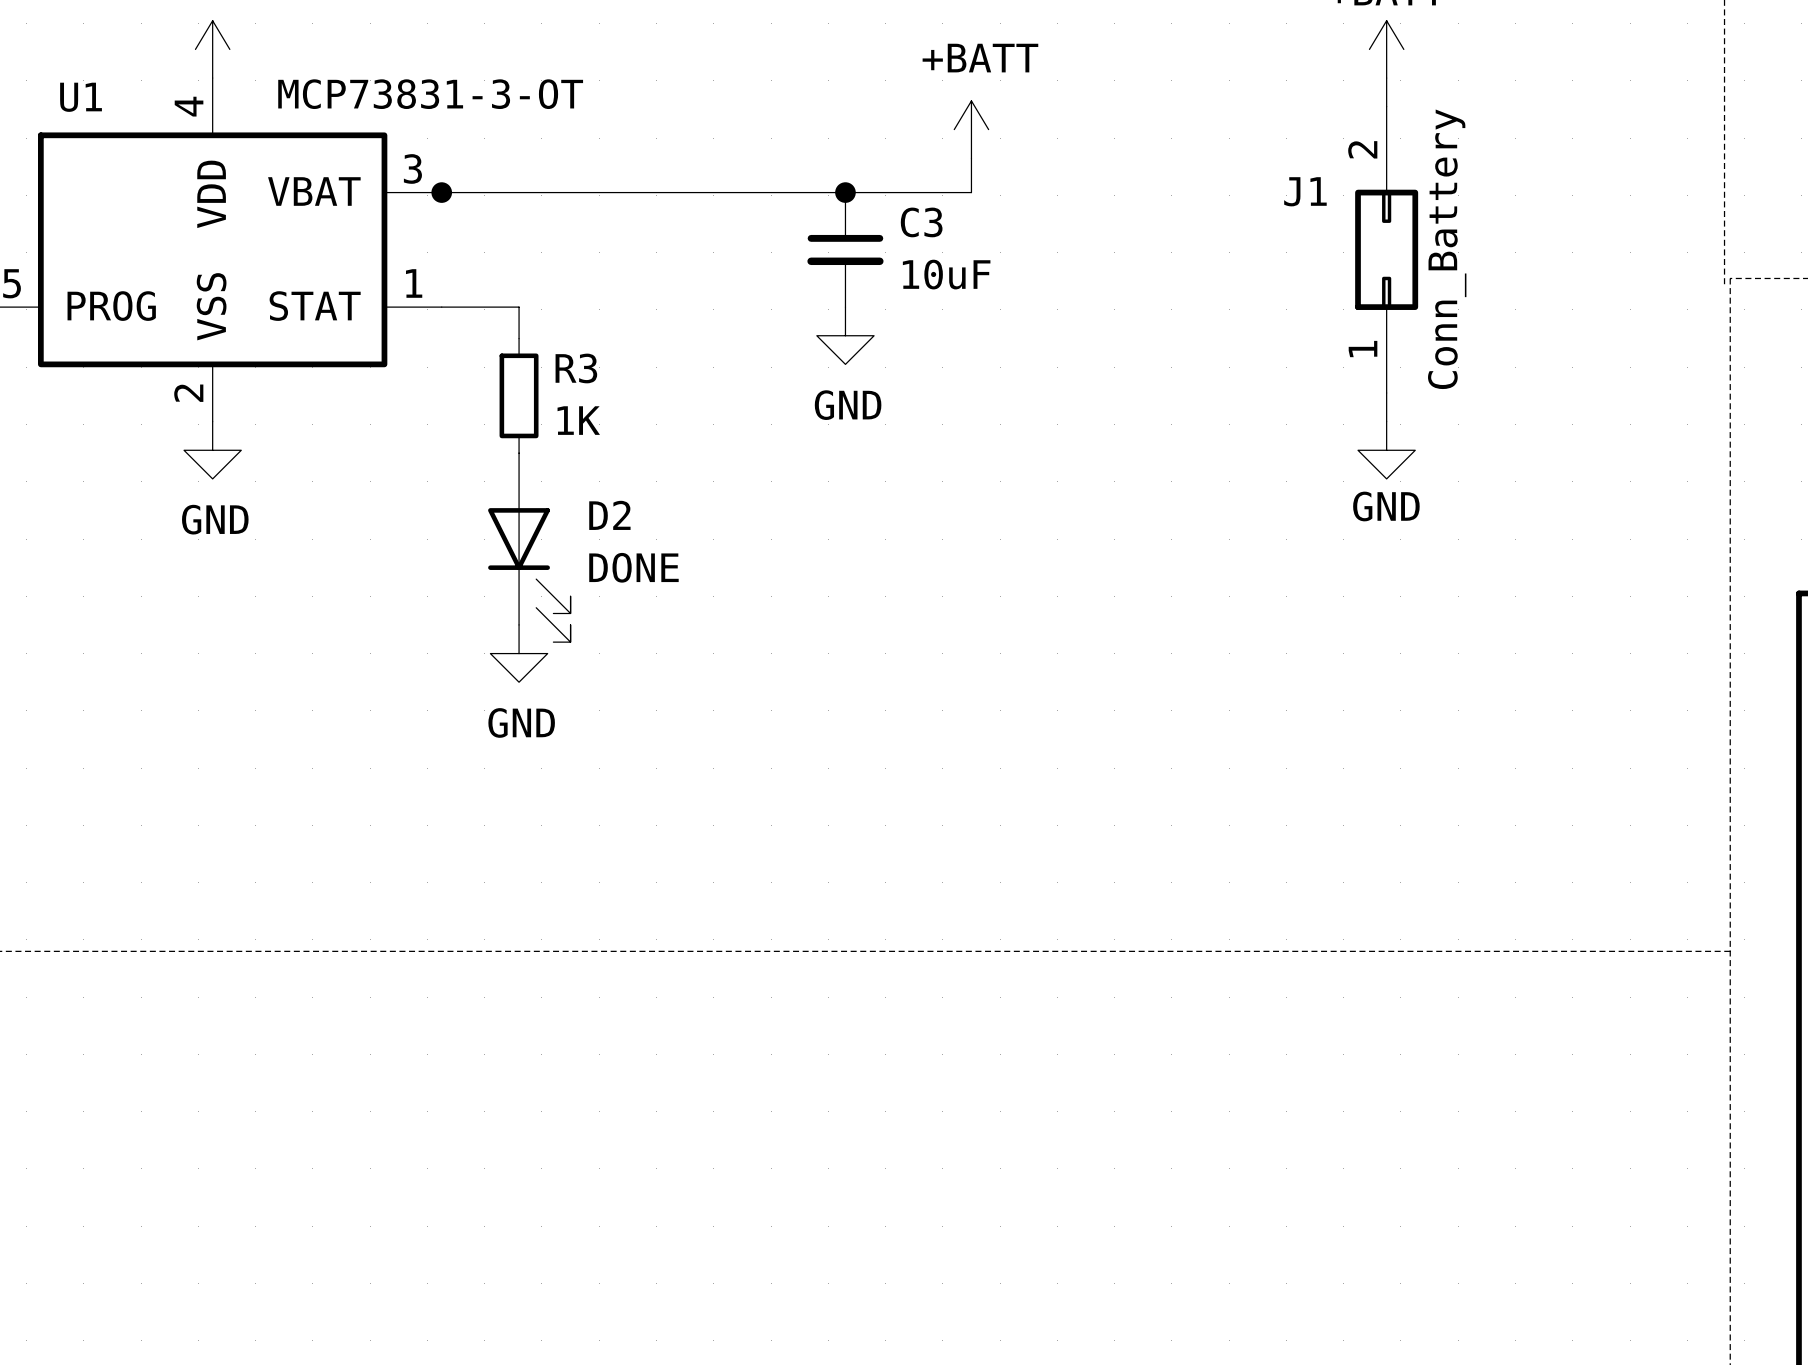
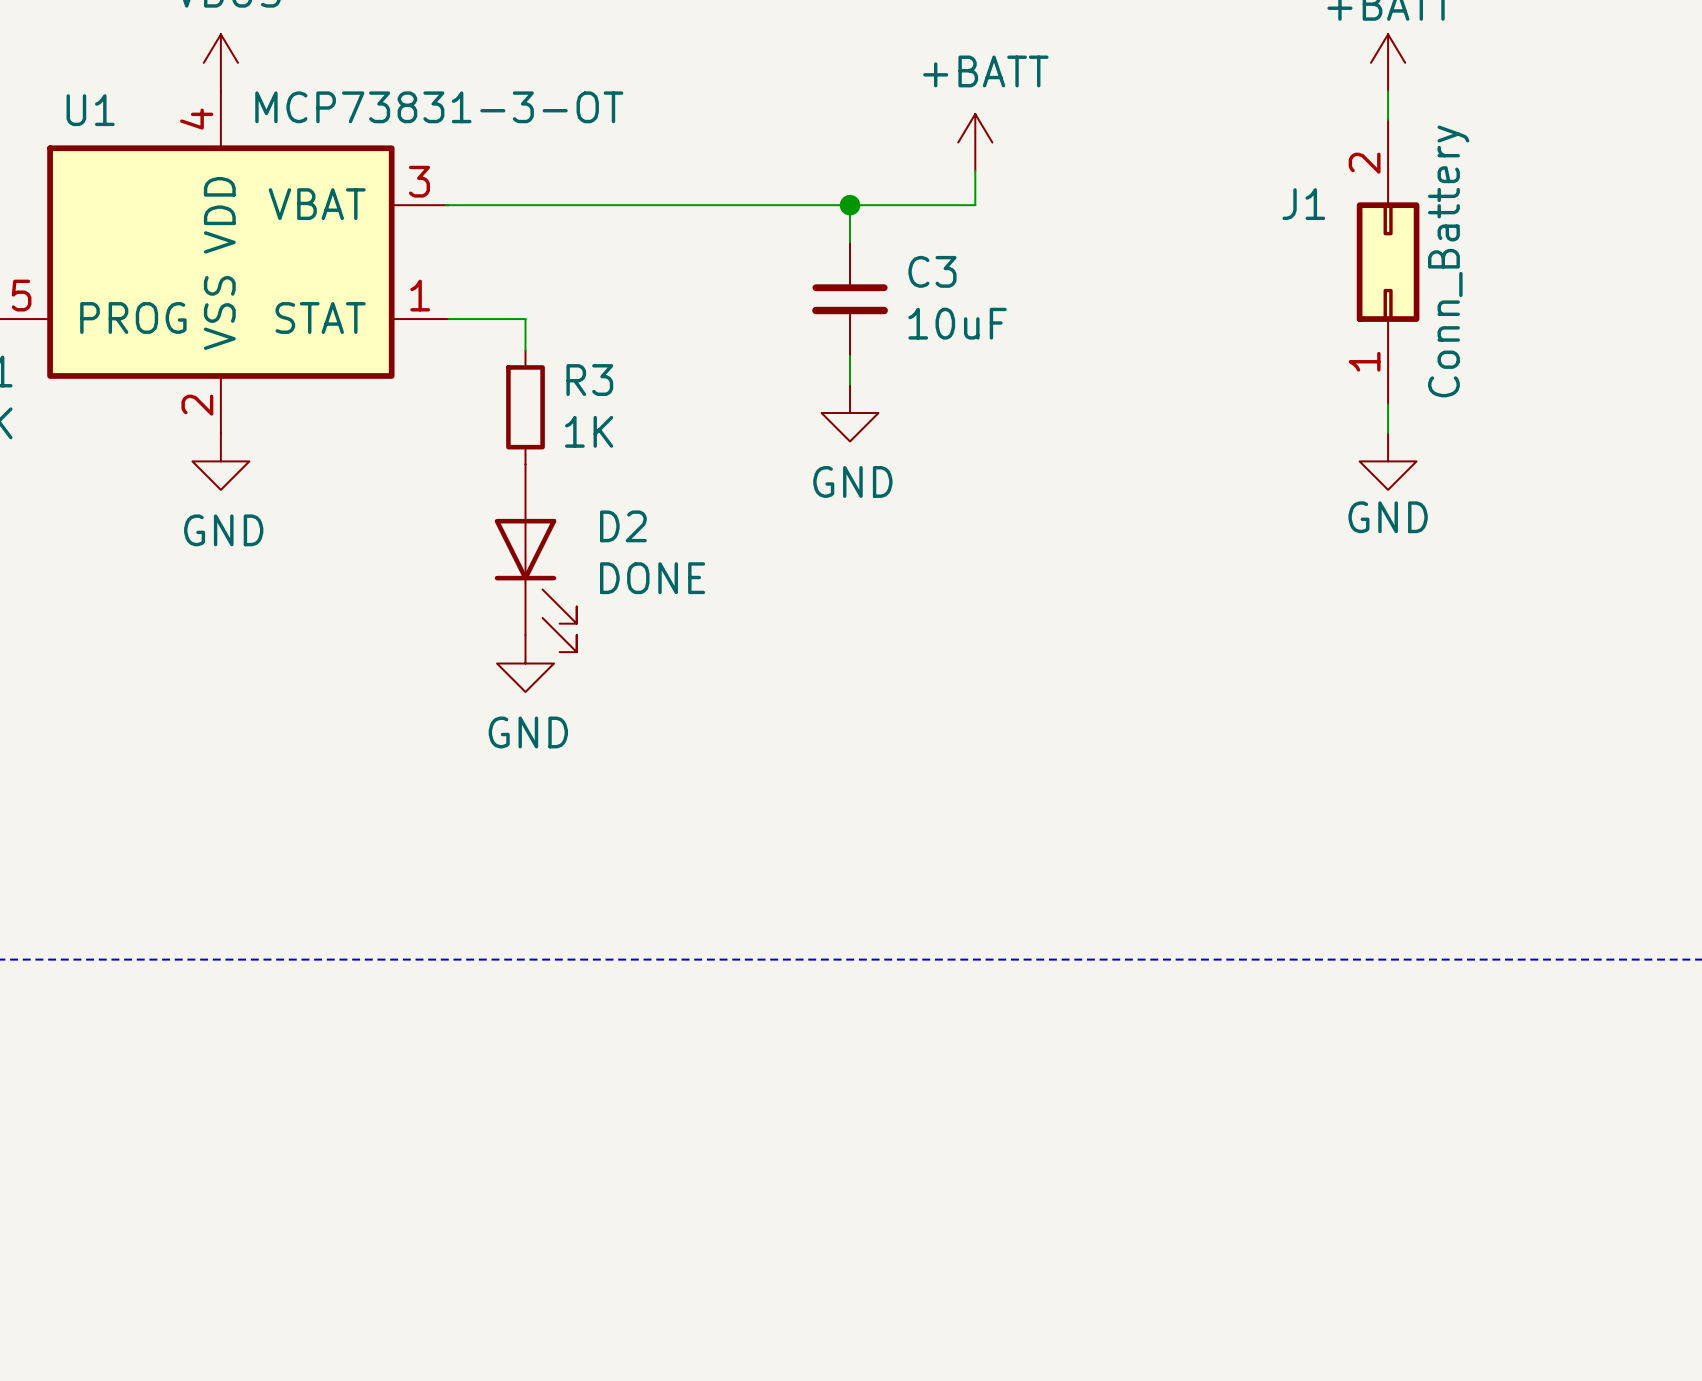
junction: (441, 192) -> none
C3 position: (845, 249) -> (850, 299)
power symbol position: GND (845, 335) -> GND (850, 413)
wire: none -> (850, 356) (850, 384)

